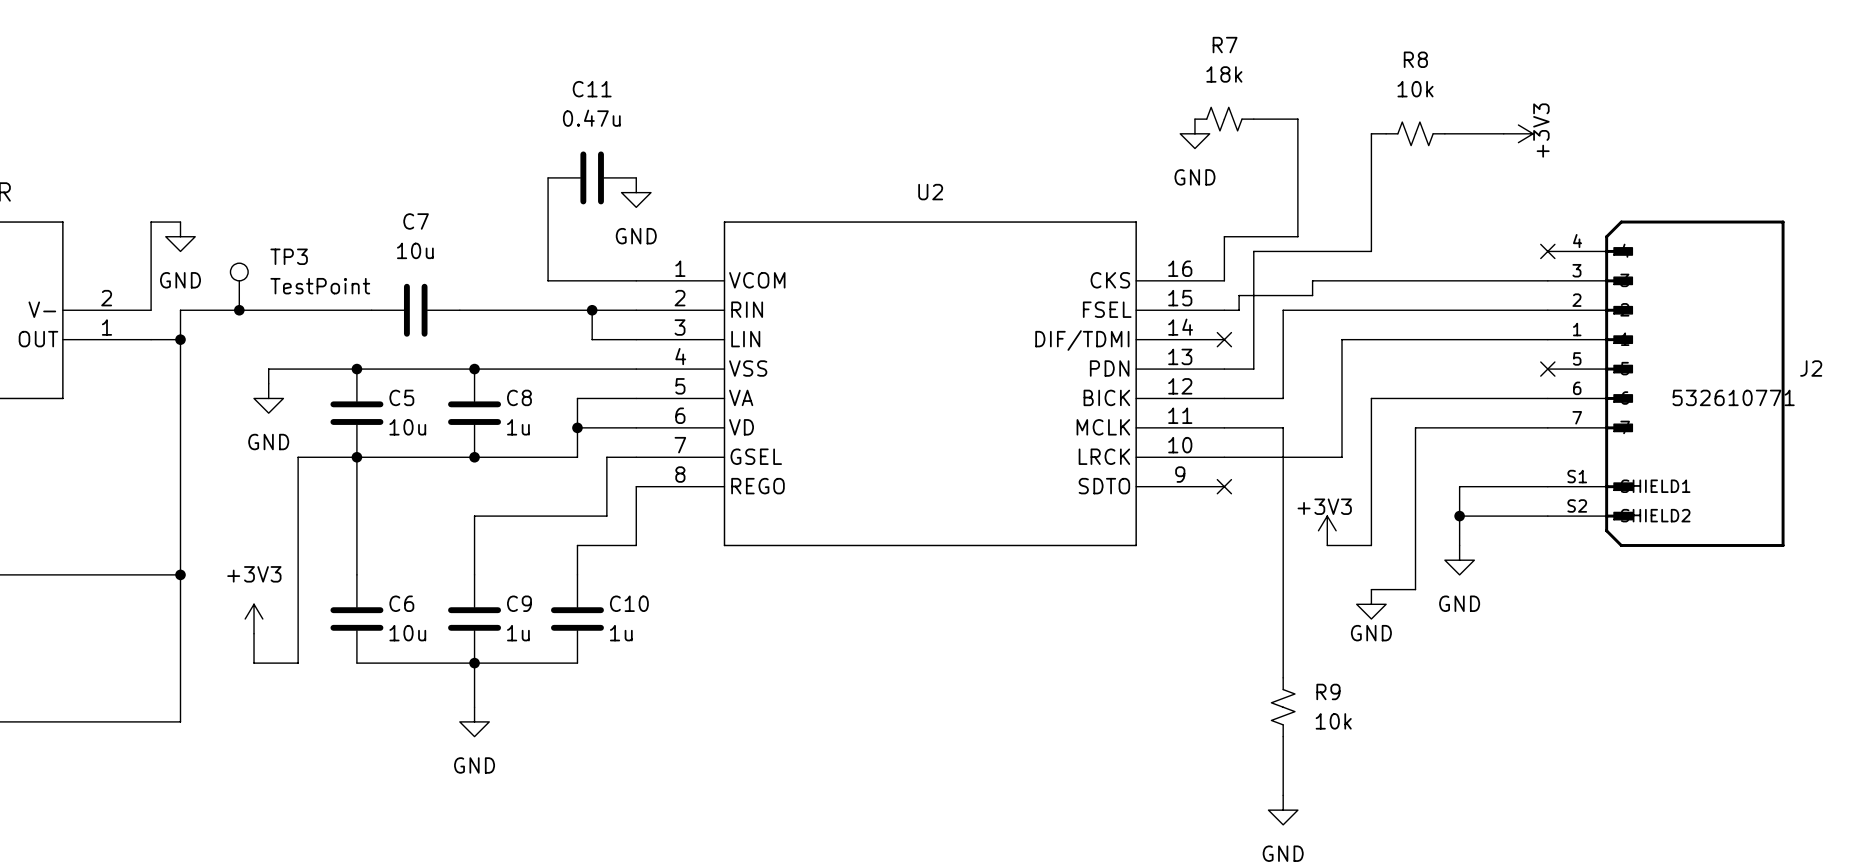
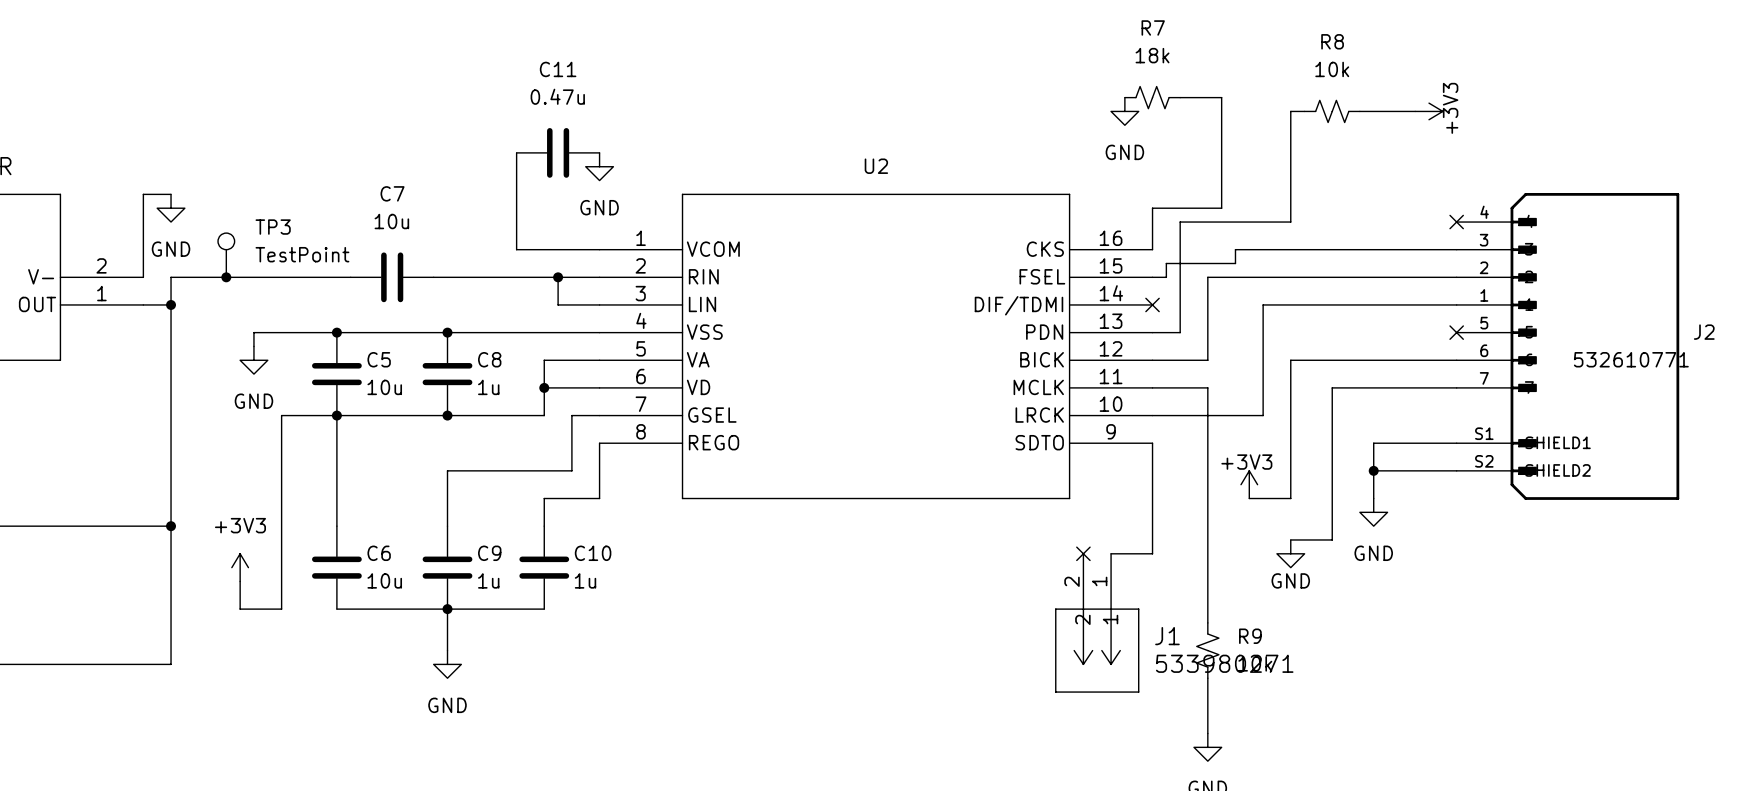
wire: none -> (1152, 443) (1152, 553) (1111, 553)
no-connect mark: (1224, 486) -> none
no-connect mark: none -> (1083, 553)
J1: none -> 533980271 (1097, 622)

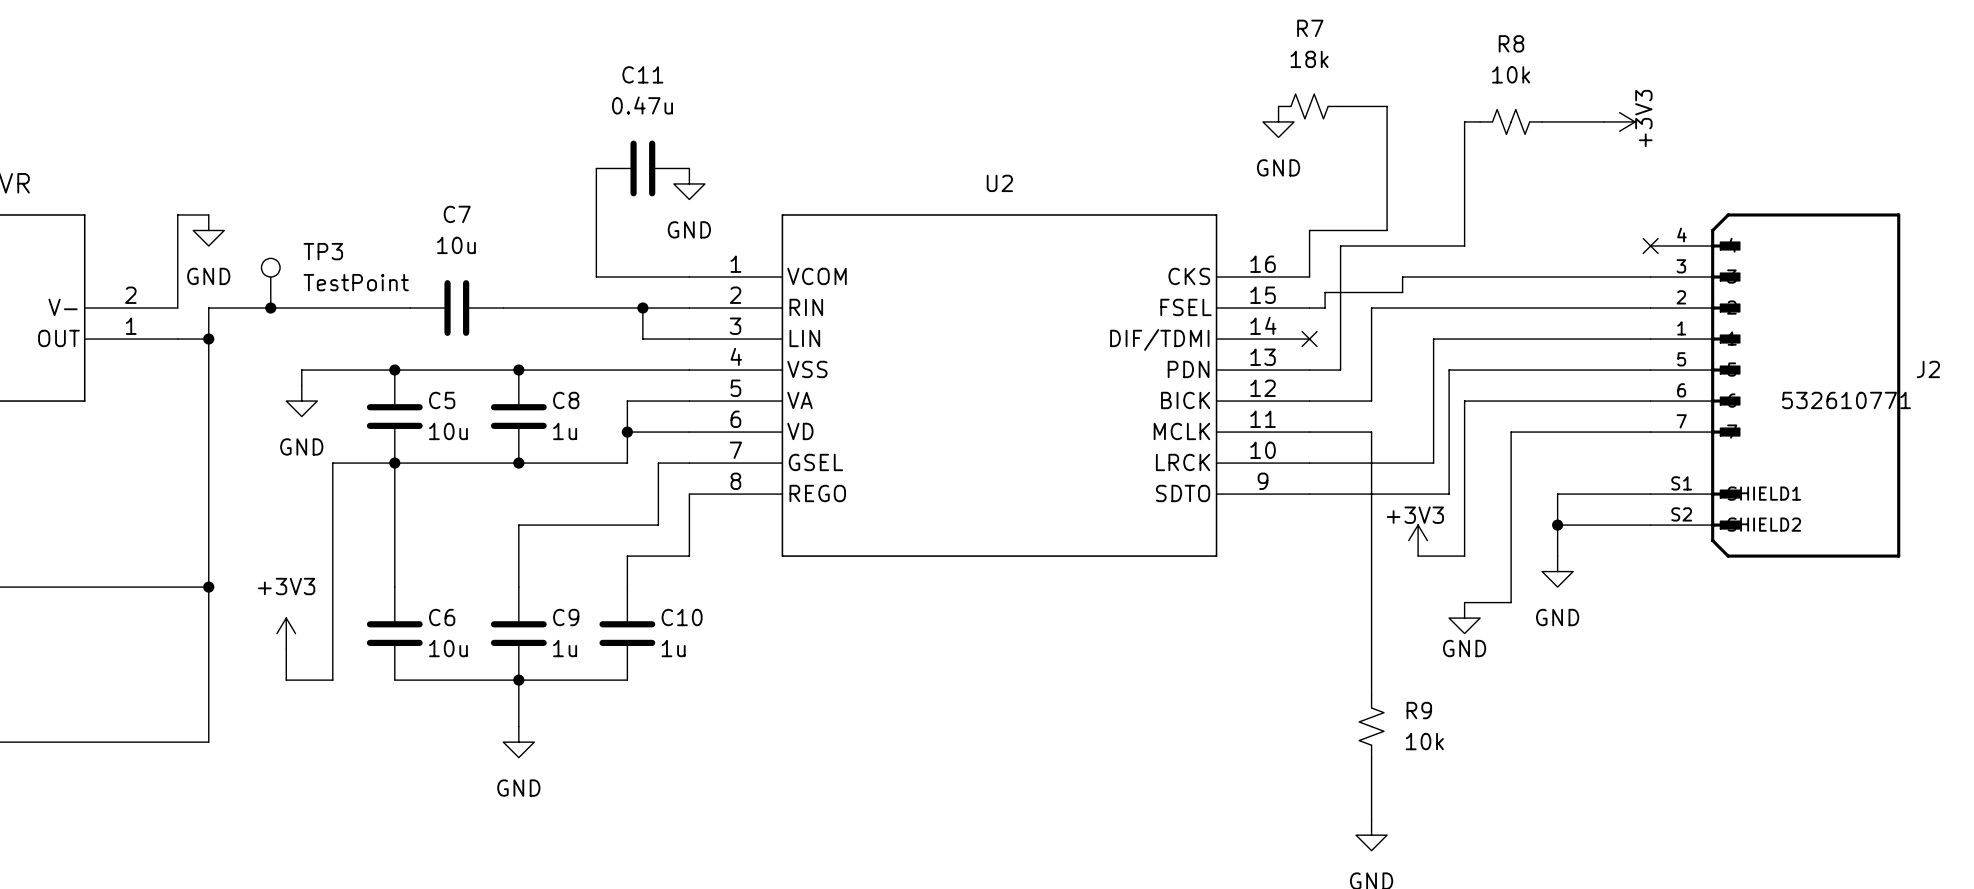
no-connect mark: (1456, 332) -> none
wire: (1152, 443) (1152, 553) (1111, 553) -> (1309, 494) (1449, 494) (1449, 370) (1650, 370)
no-connect mark: (1083, 553) -> none
J1: 533980271 (1097, 622) -> none

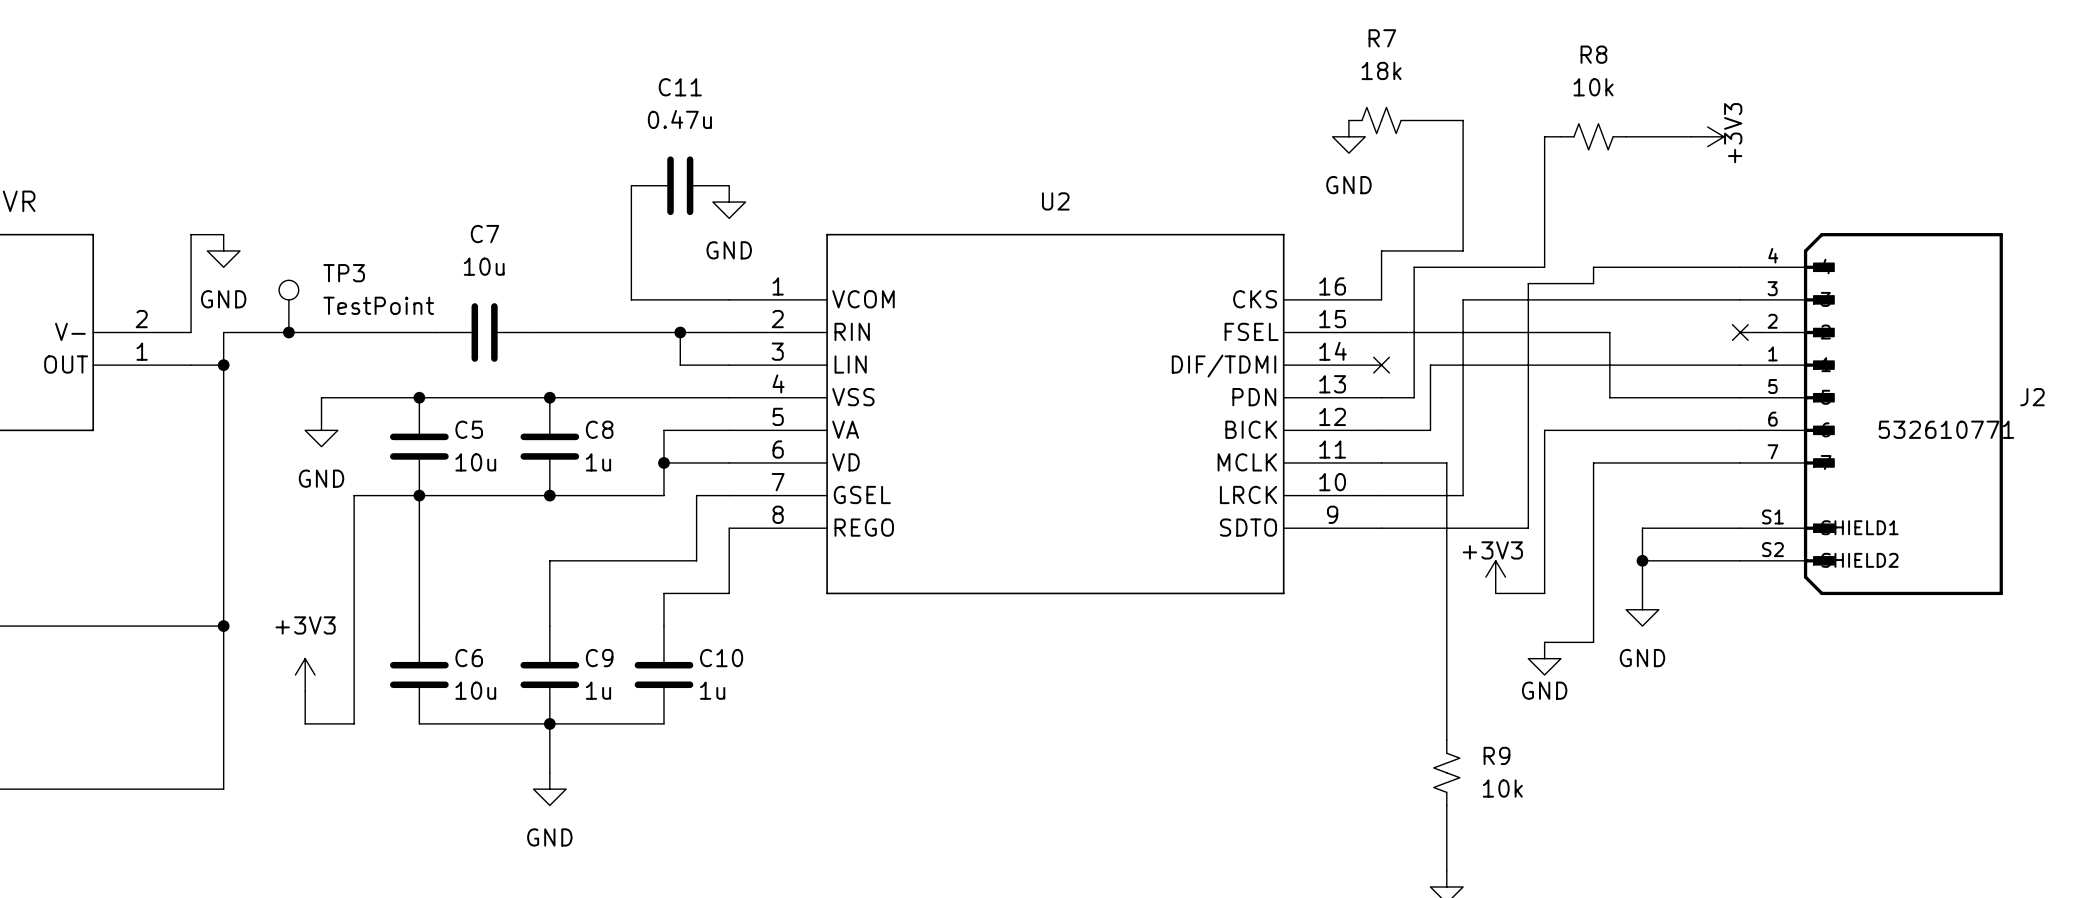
wire: none -> (1740, 267) (1593, 267) (1593, 283) (1528, 283) (1528, 397)
no-connect mark position: (1650, 245) -> (1740, 332)
wire: (1402, 277) (1402, 292) (1325, 292) (1325, 308) -> (1446, 332) (1397, 332)
wire: none -> (1479, 299) (1463, 299) (1463, 495)
wire: (1371, 308) (1371, 401) (1356, 401) -> none
wire: (1526, 308) (1650, 308) -> none
wire: (1433, 339) (1433, 463) (1387, 463) -> (1512, 365) (1430, 365) (1430, 430)
wire: (1449, 370) (1526, 370) -> (1609, 332) (1609, 397)

